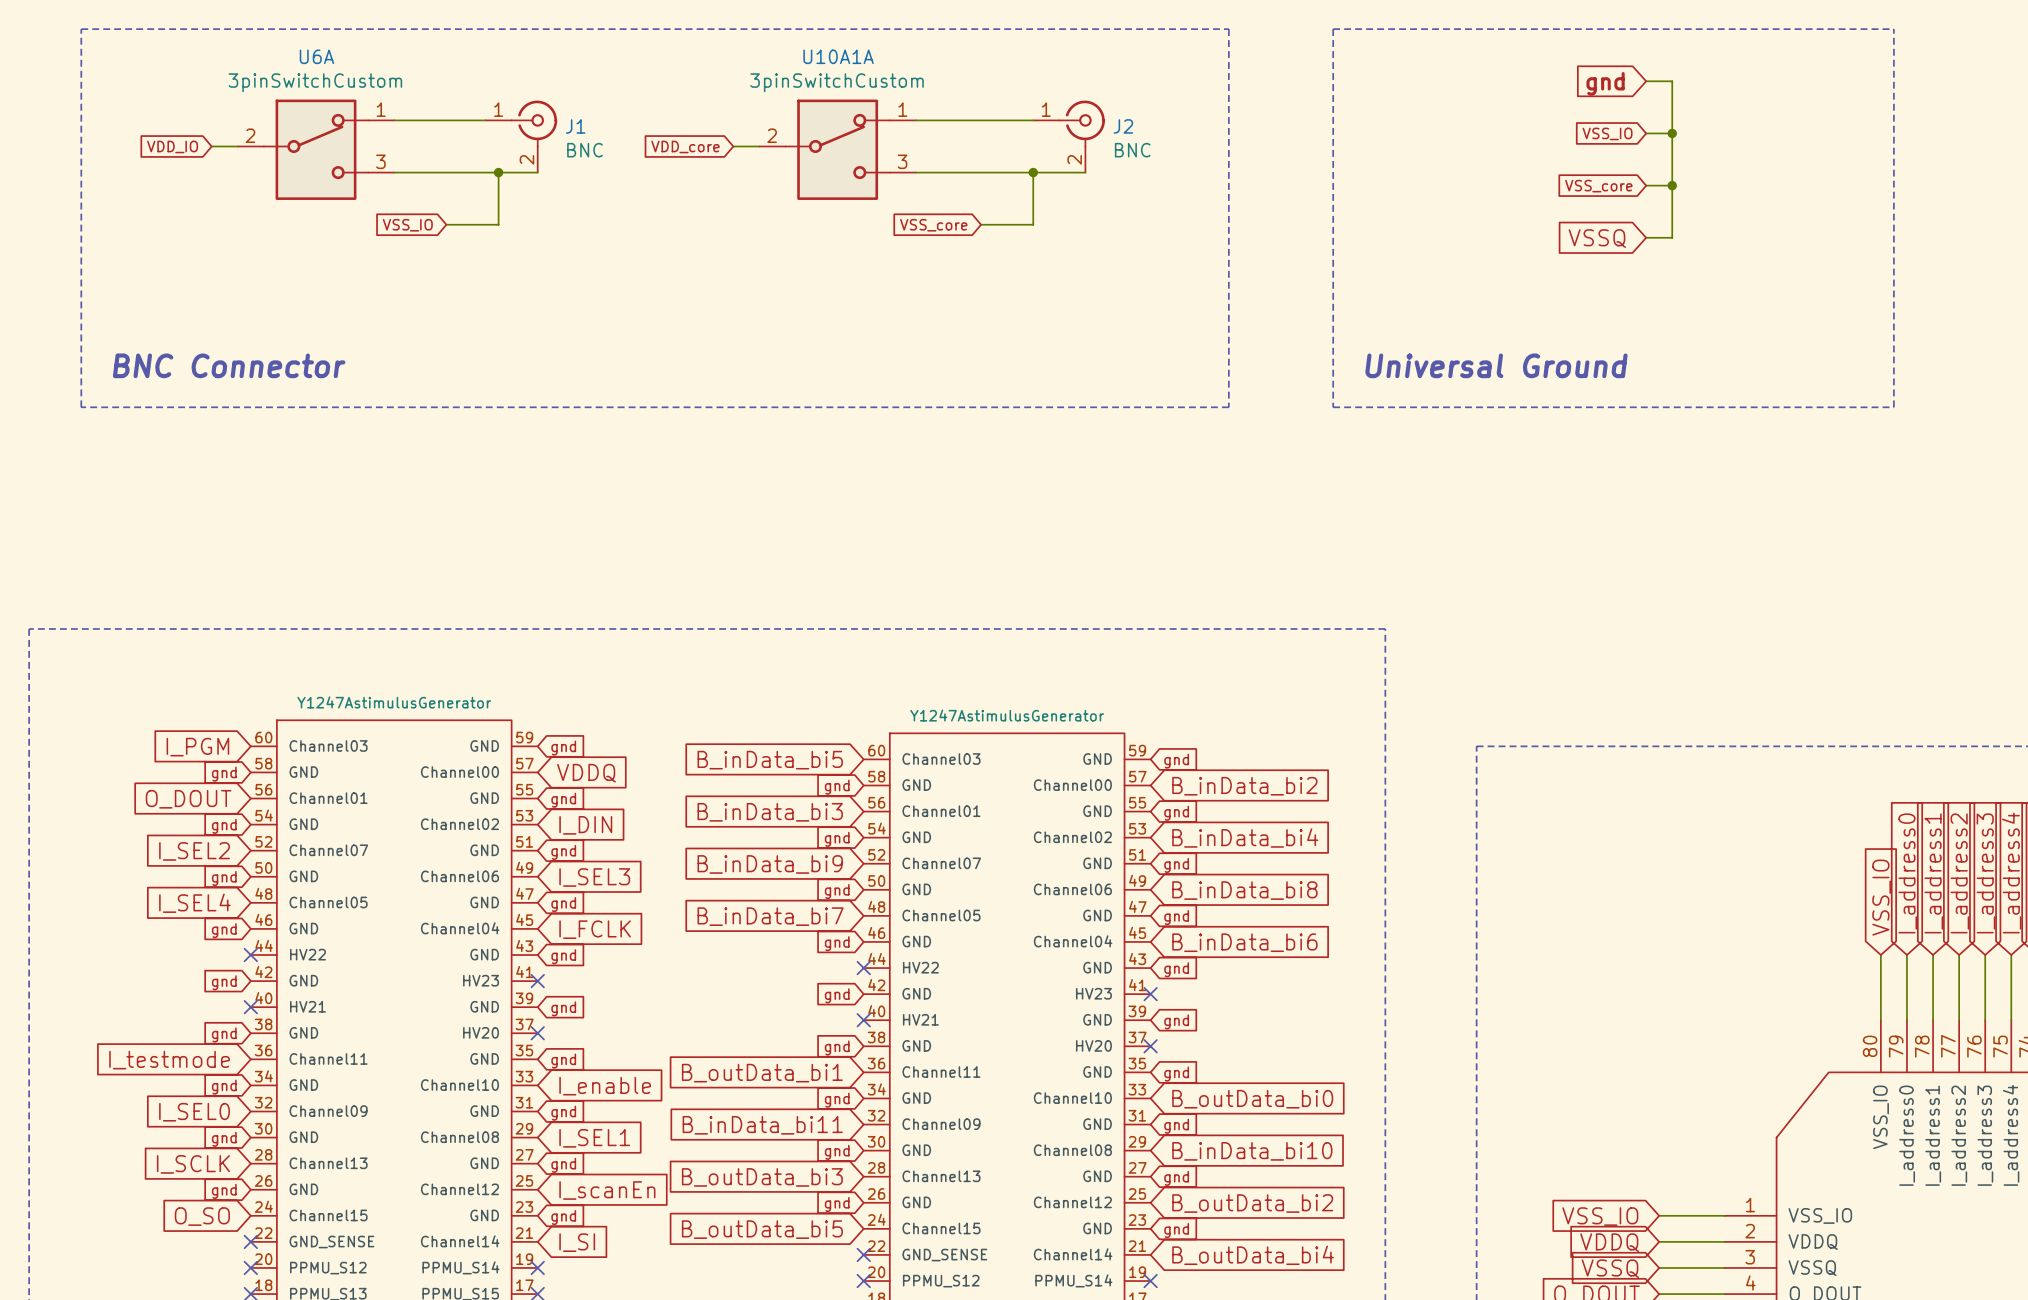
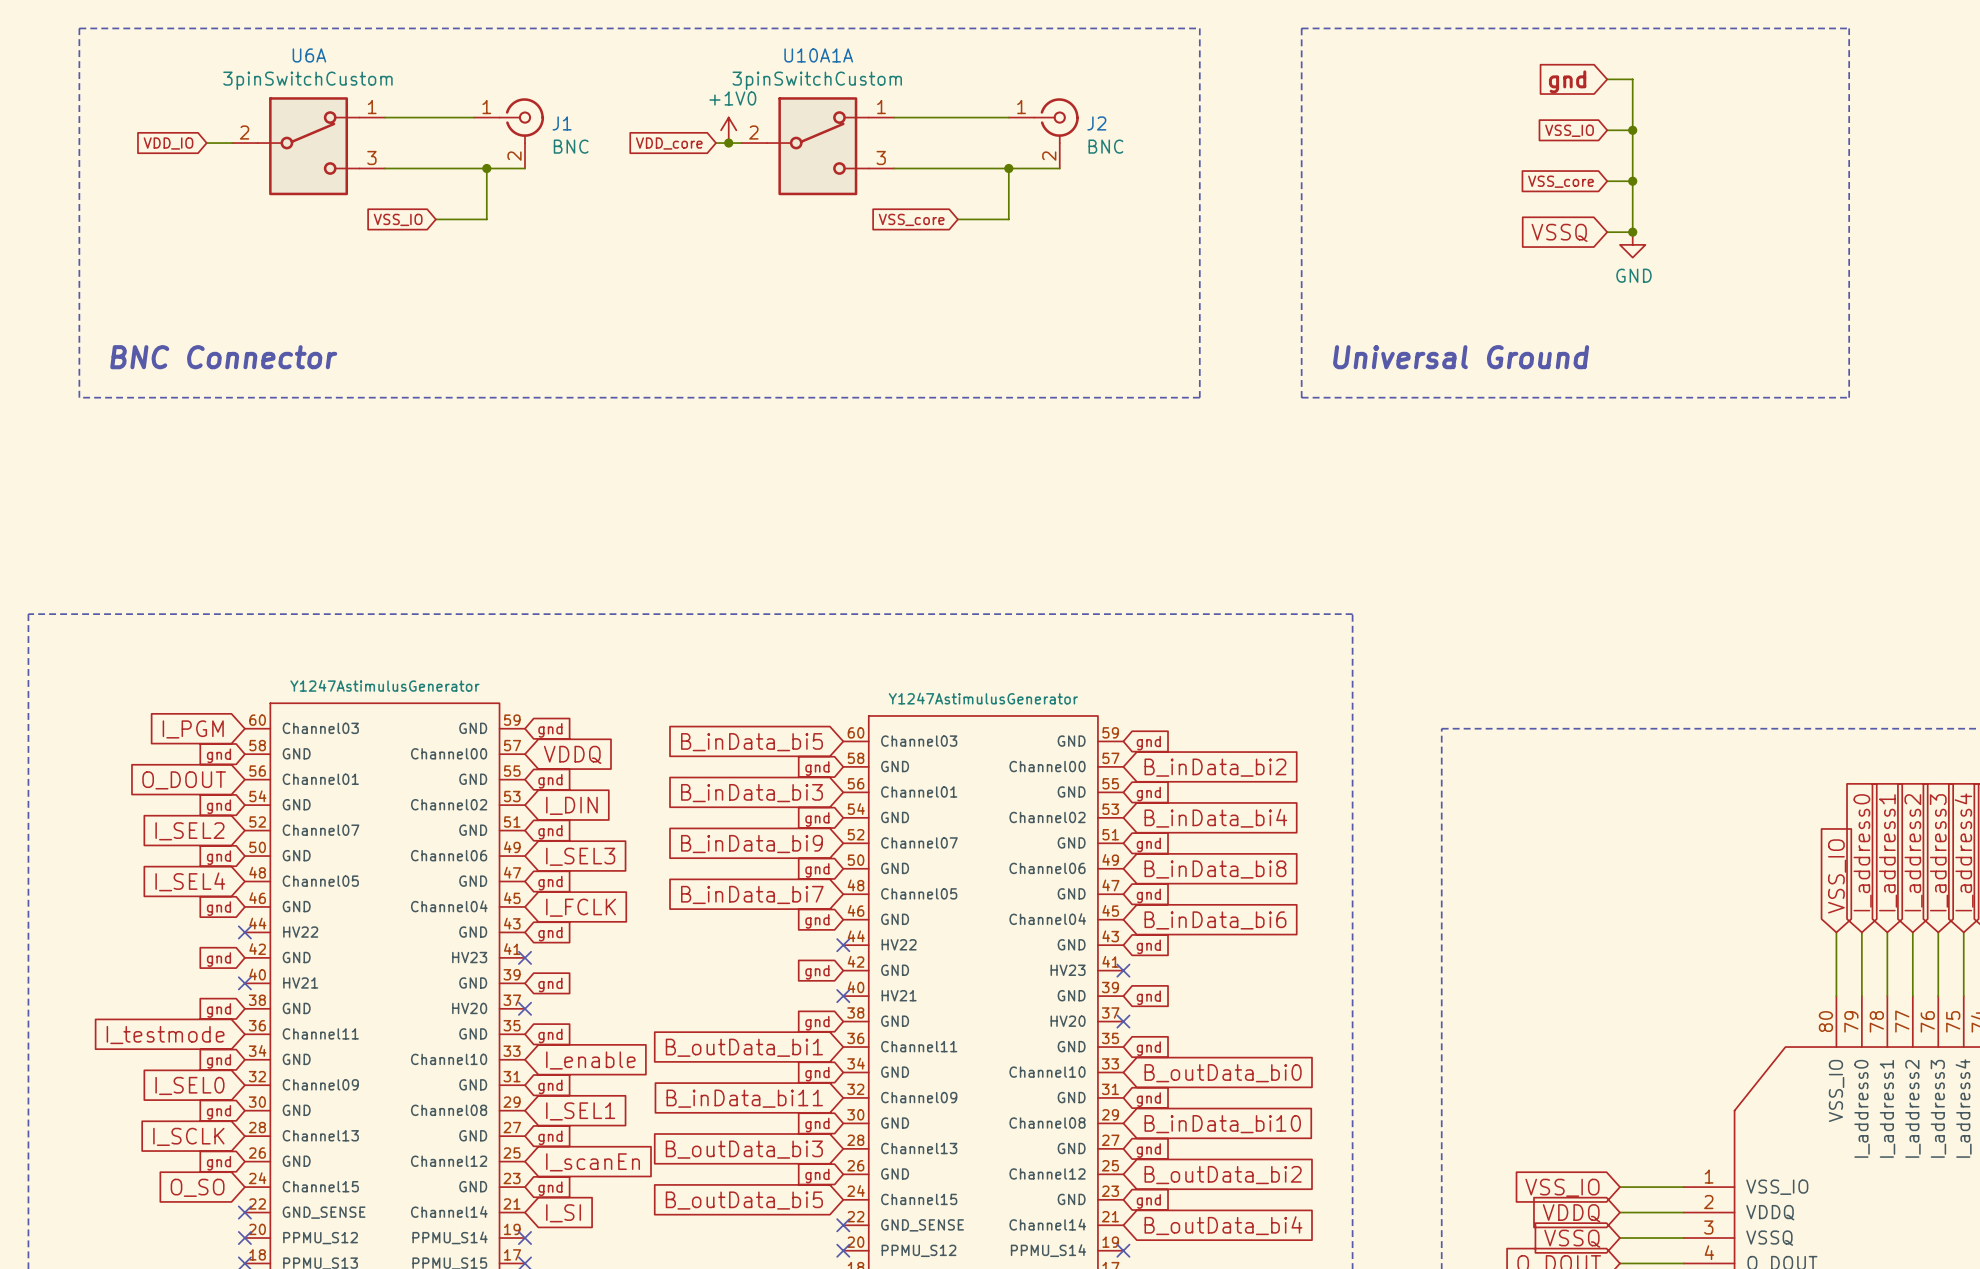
power symbol: none -> +1V0 (728, 130)
junction: none -> (728, 143)
junction: none -> (1632, 232)
power symbol: none -> GND (1632, 244)

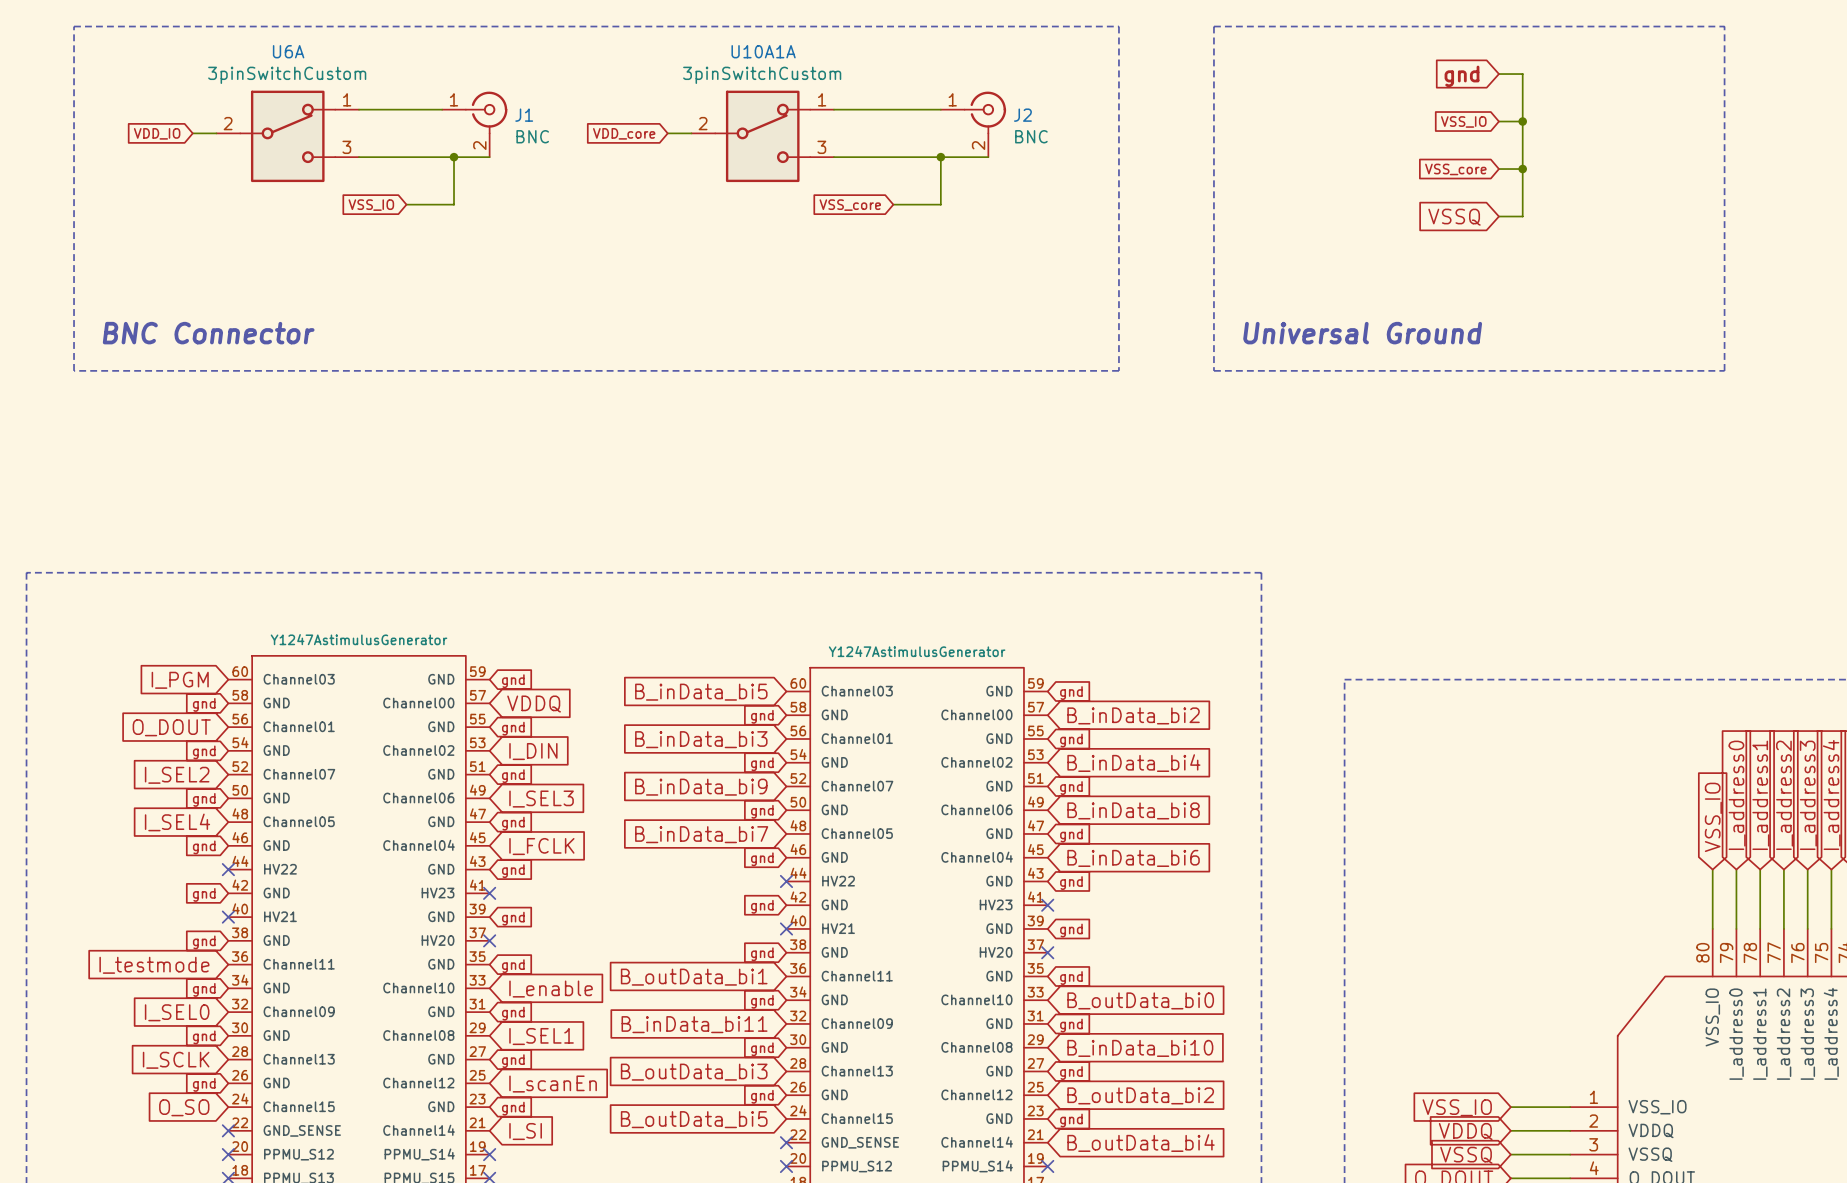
power symbol: +1V0 (728, 130) -> none
junction: (728, 143) -> none
junction: (1632, 232) -> none
power symbol: GND (1632, 244) -> none

